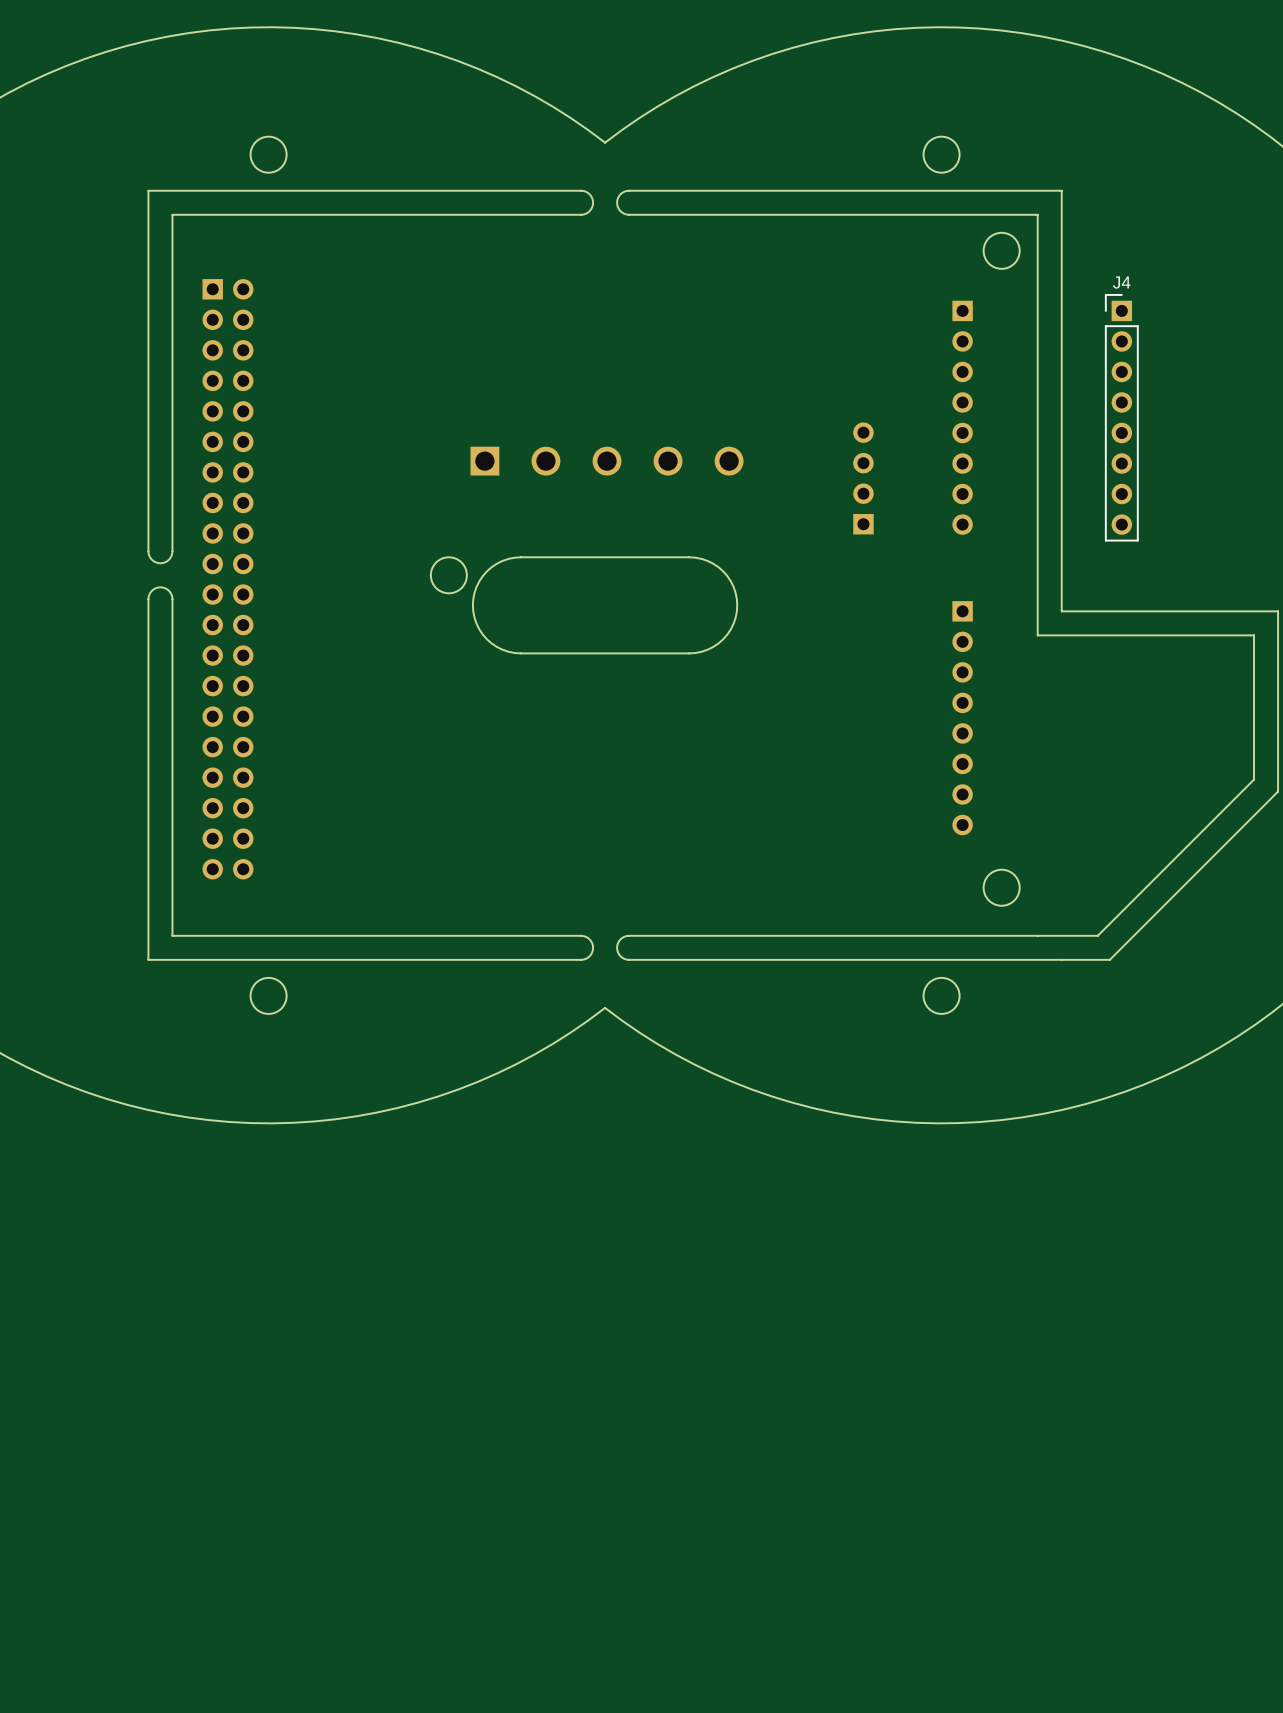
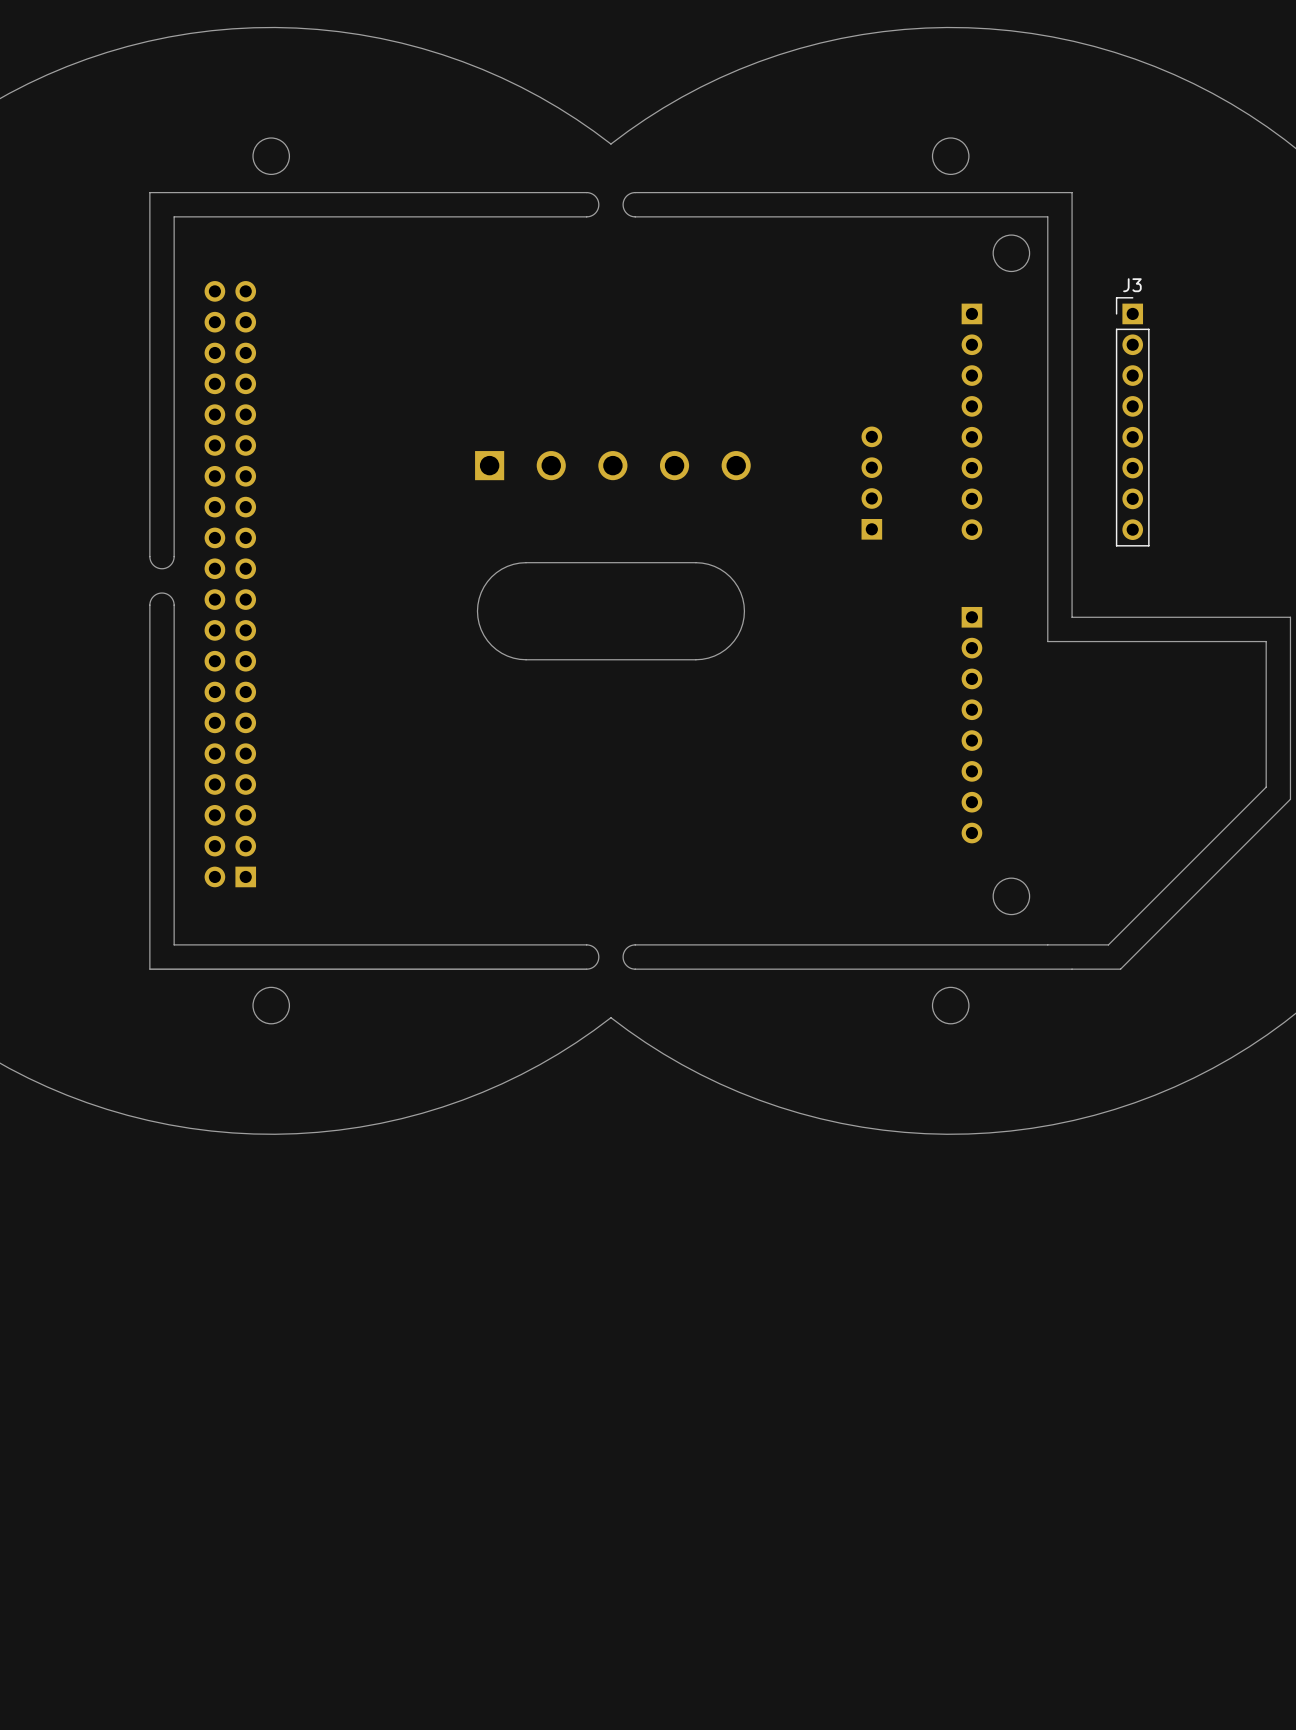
J4 name: J4 (1121, 282) -> J3 (1132, 285)
round board edge: [430, 556, 468, 594] -> none
part rotation: 0° (227, 579) -> 180° (230, 584)

